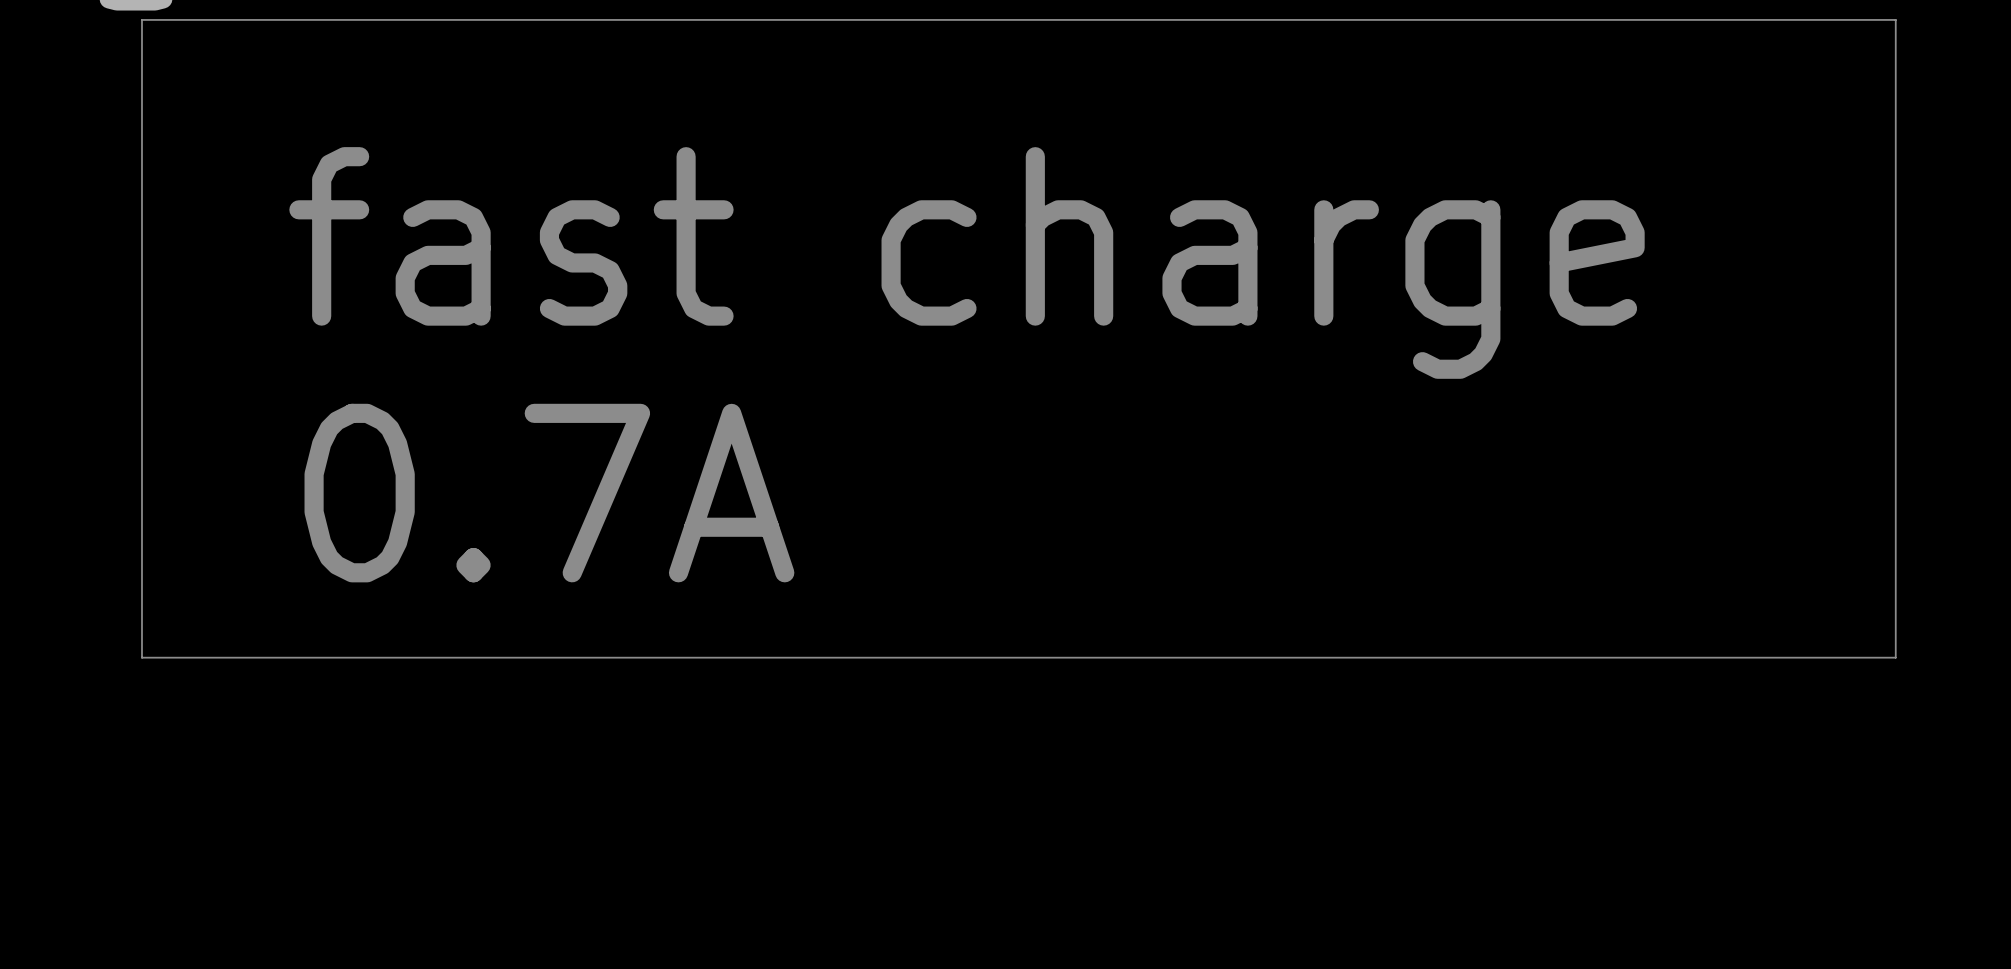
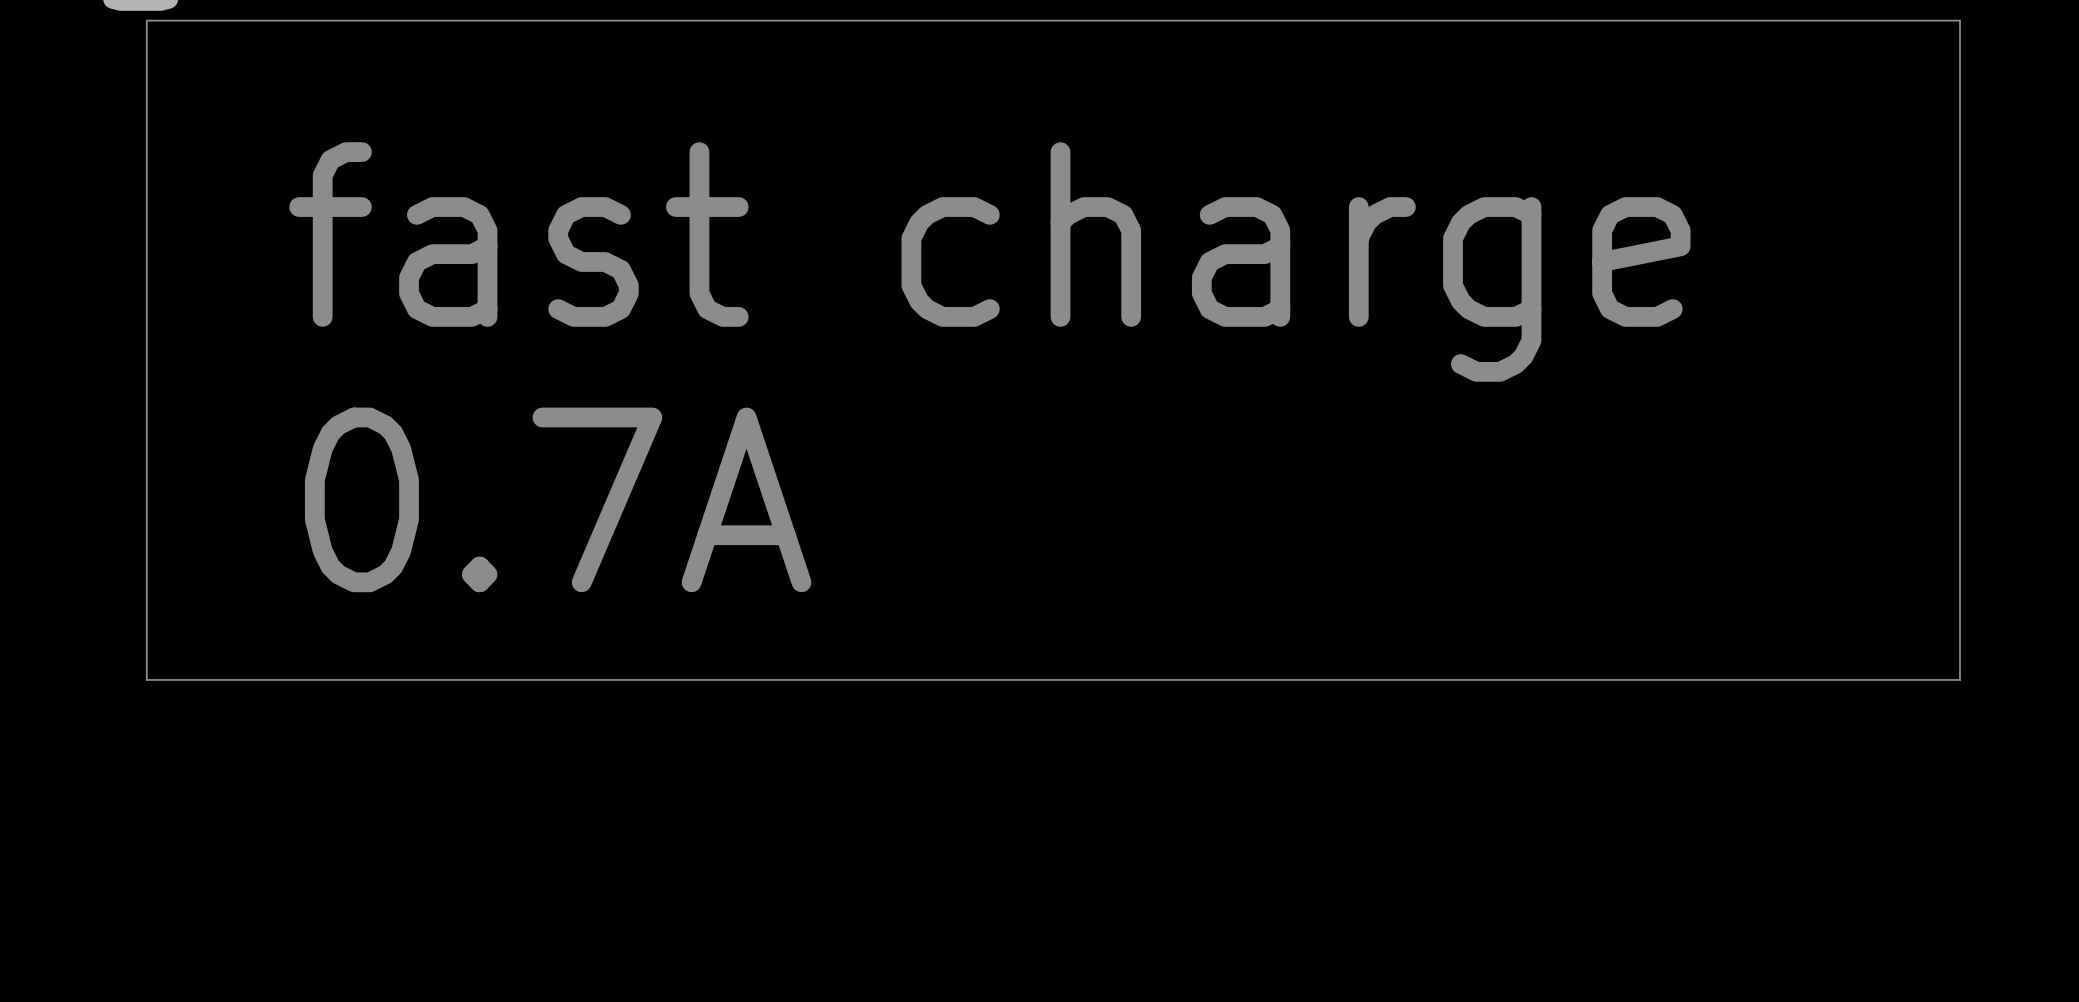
text position: fast charge (967, 262) -> fast charge (989, 261)
text position: 0.7A (549, 493) -> 0.7A (558, 499)

